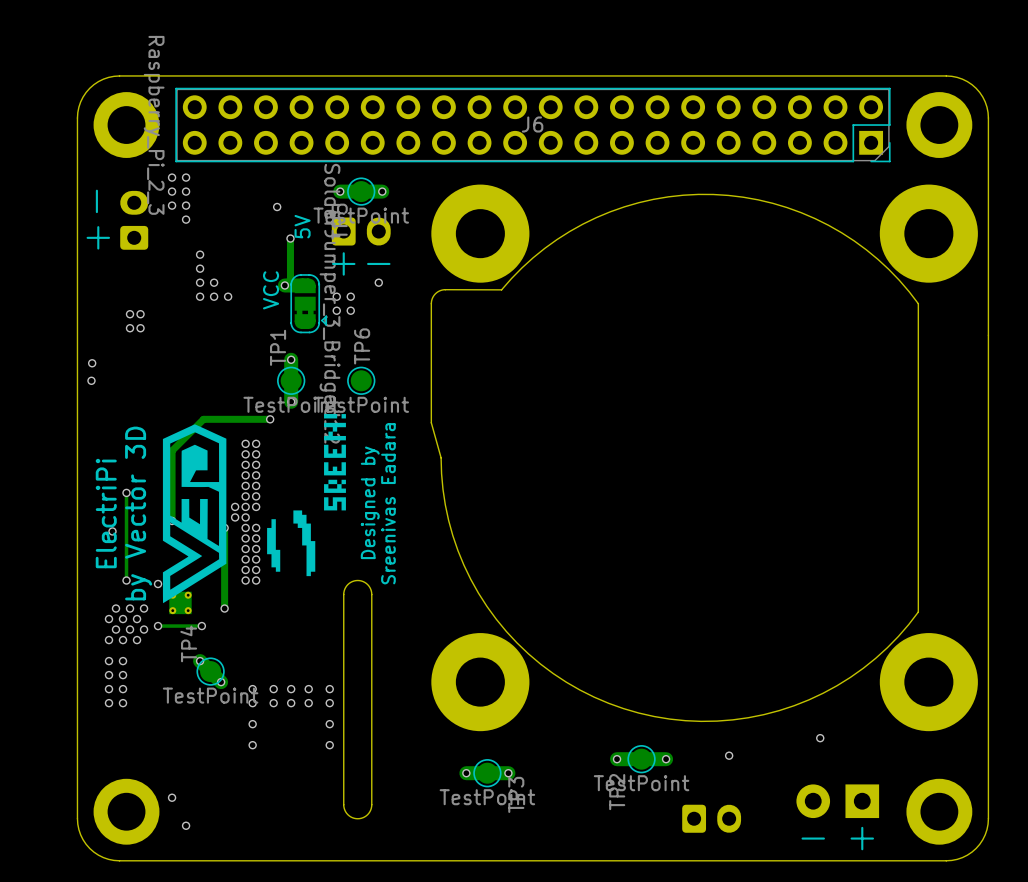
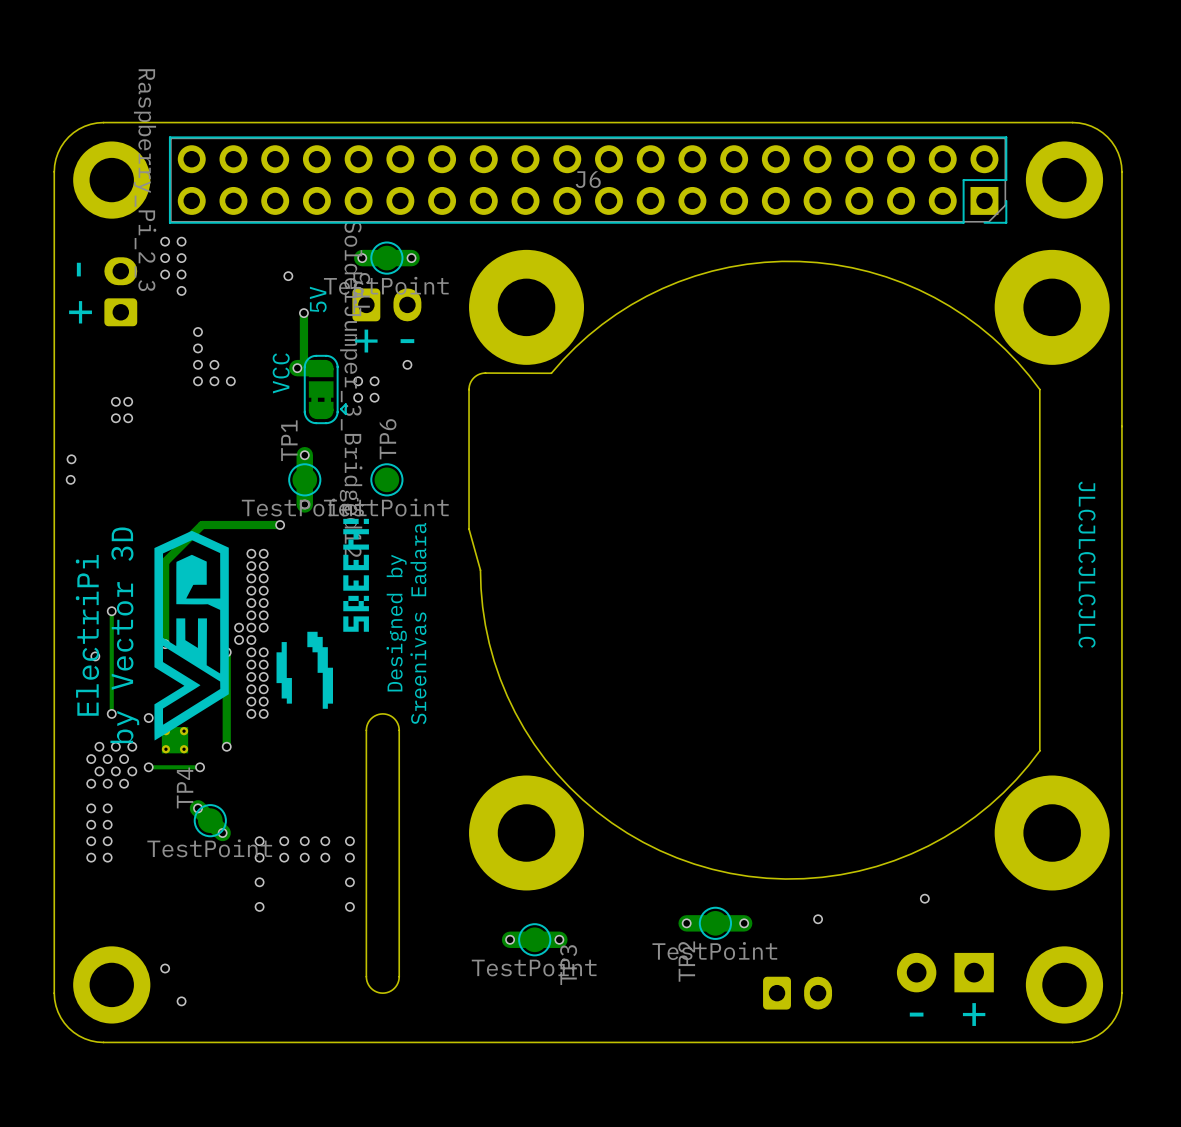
text: none -> JLCJLCJLCJLC (1087, 564)

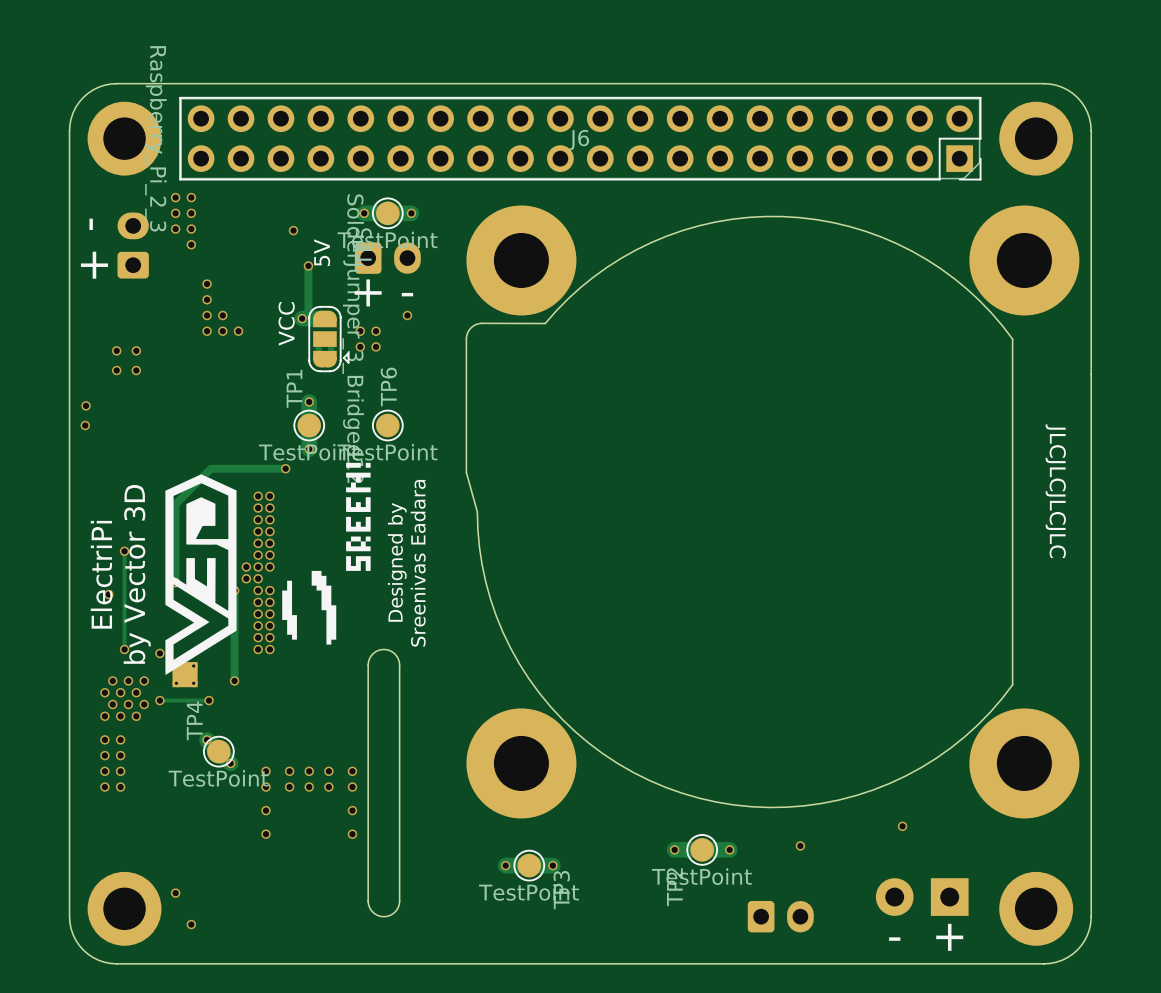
via: none -> (116, 350)
via: (115, 401) -> none
via: none -> (136, 350)
via: (128, 401) -> none
via: (115, 418) -> none
via: (128, 418) -> none
via: none -> (116, 370)
via: none -> (136, 370)

